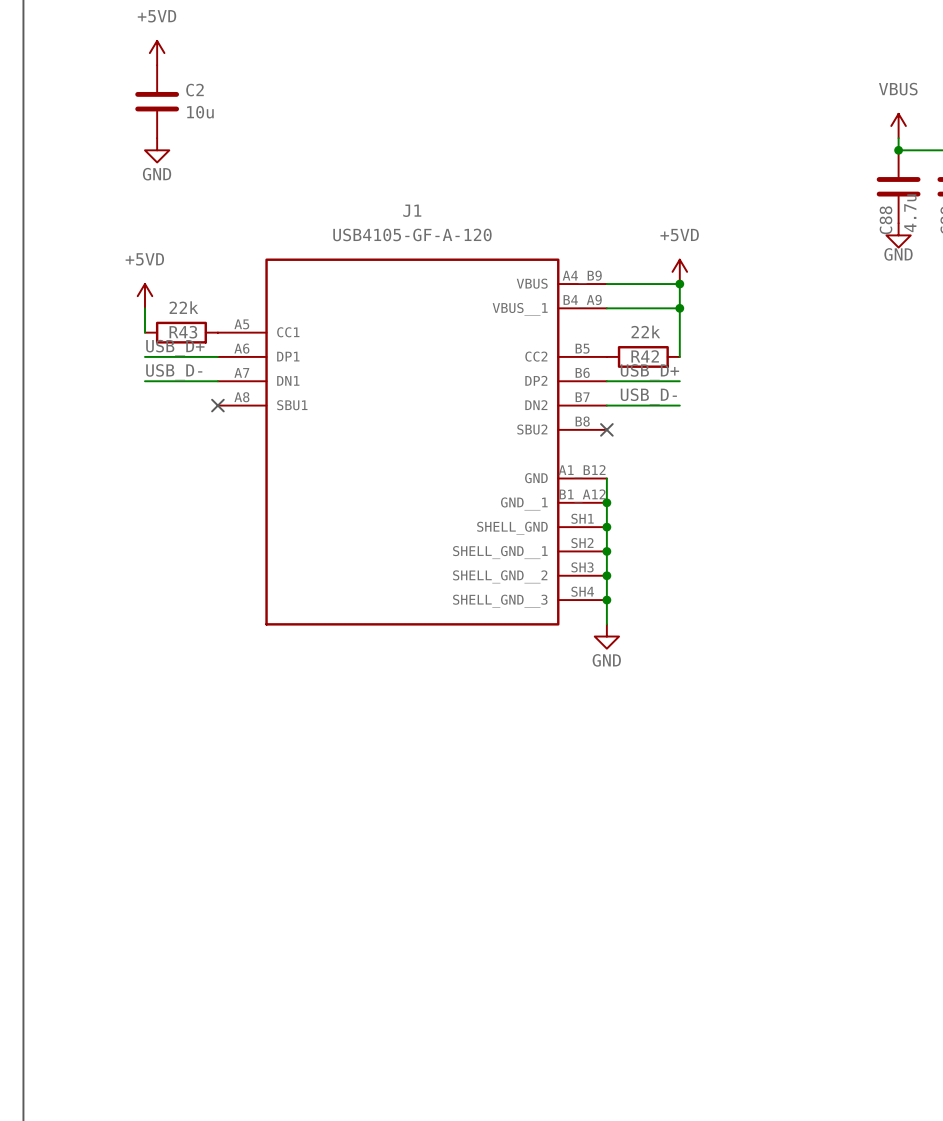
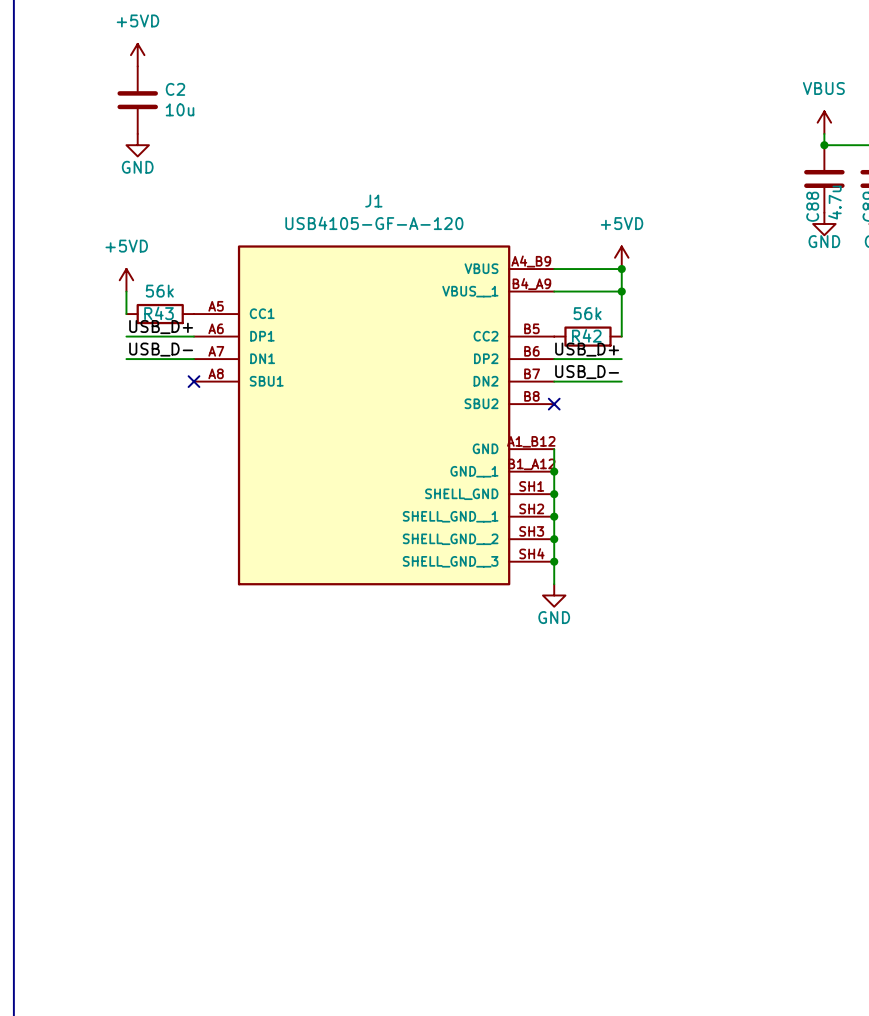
R43 value: 22k (183, 307) -> 56k (159, 291)
R42 value: 22k (645, 331) -> 56k (587, 313)

